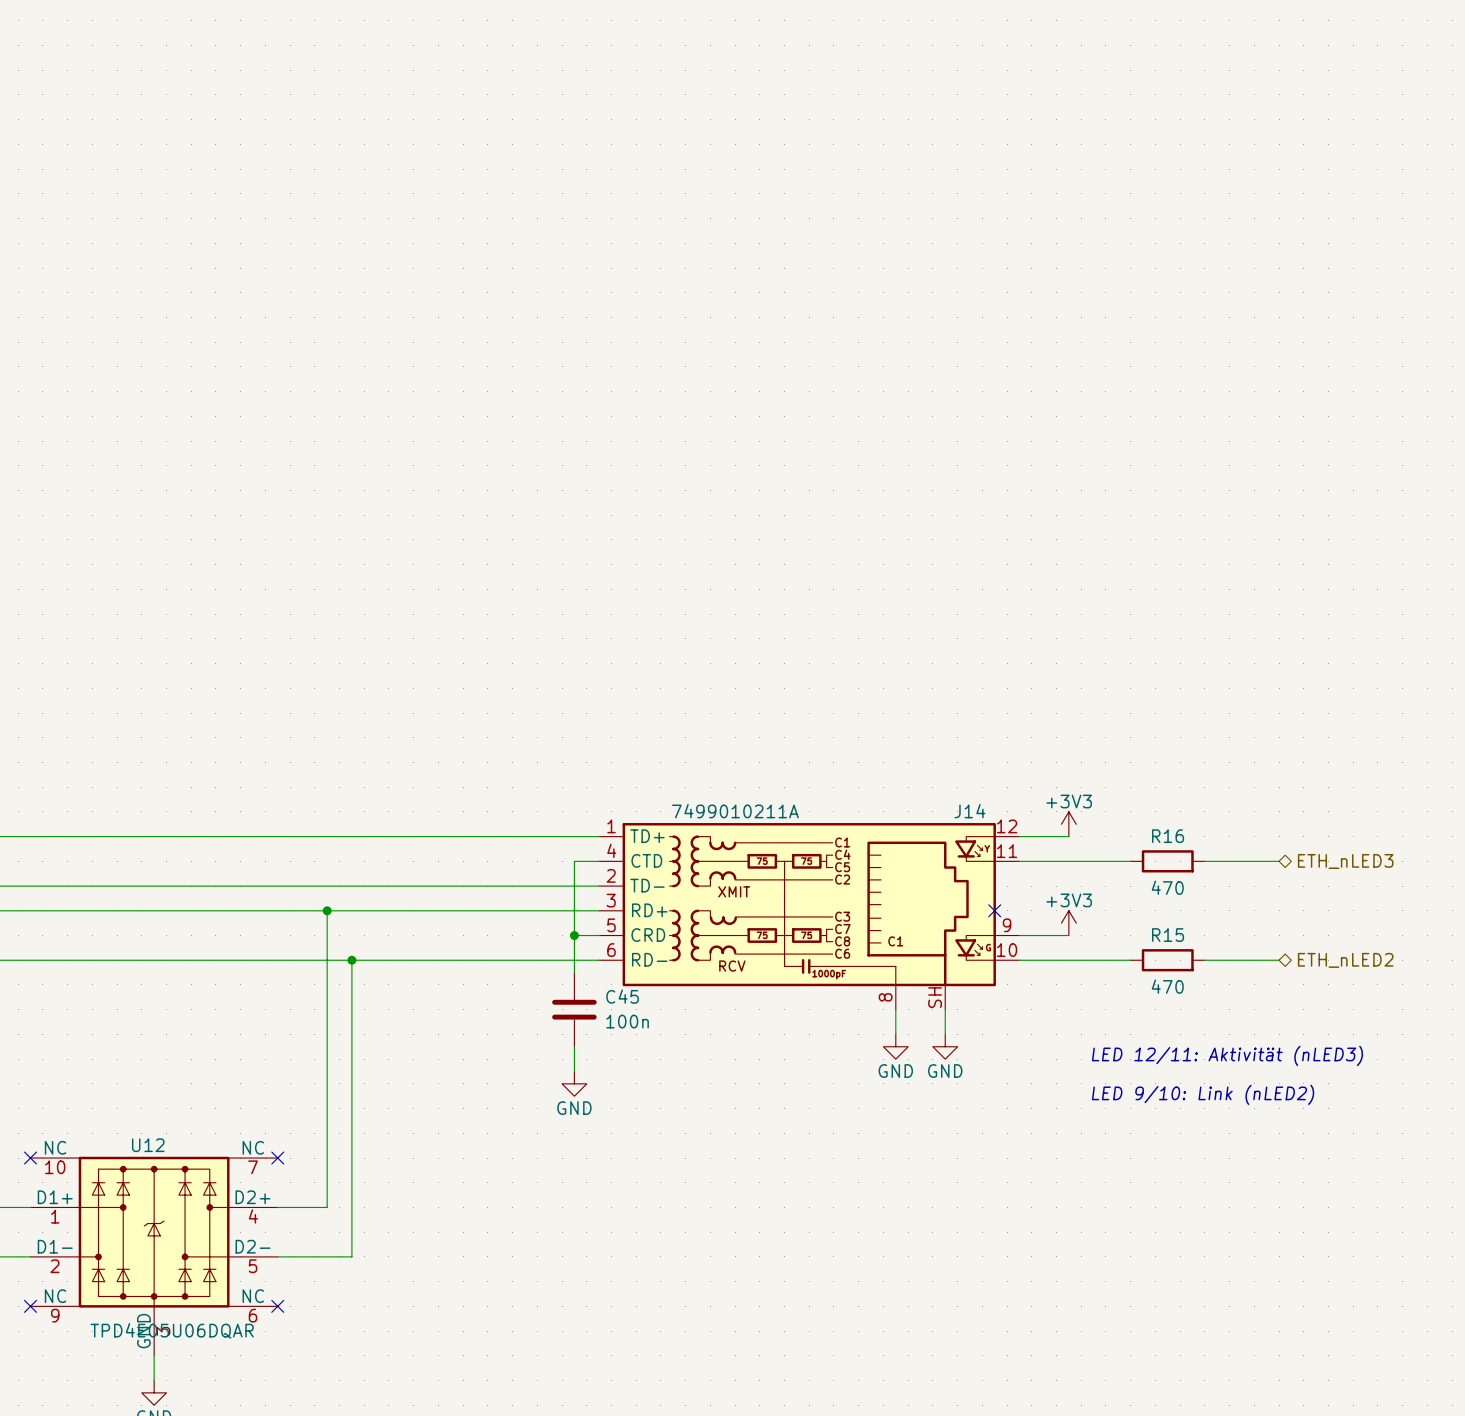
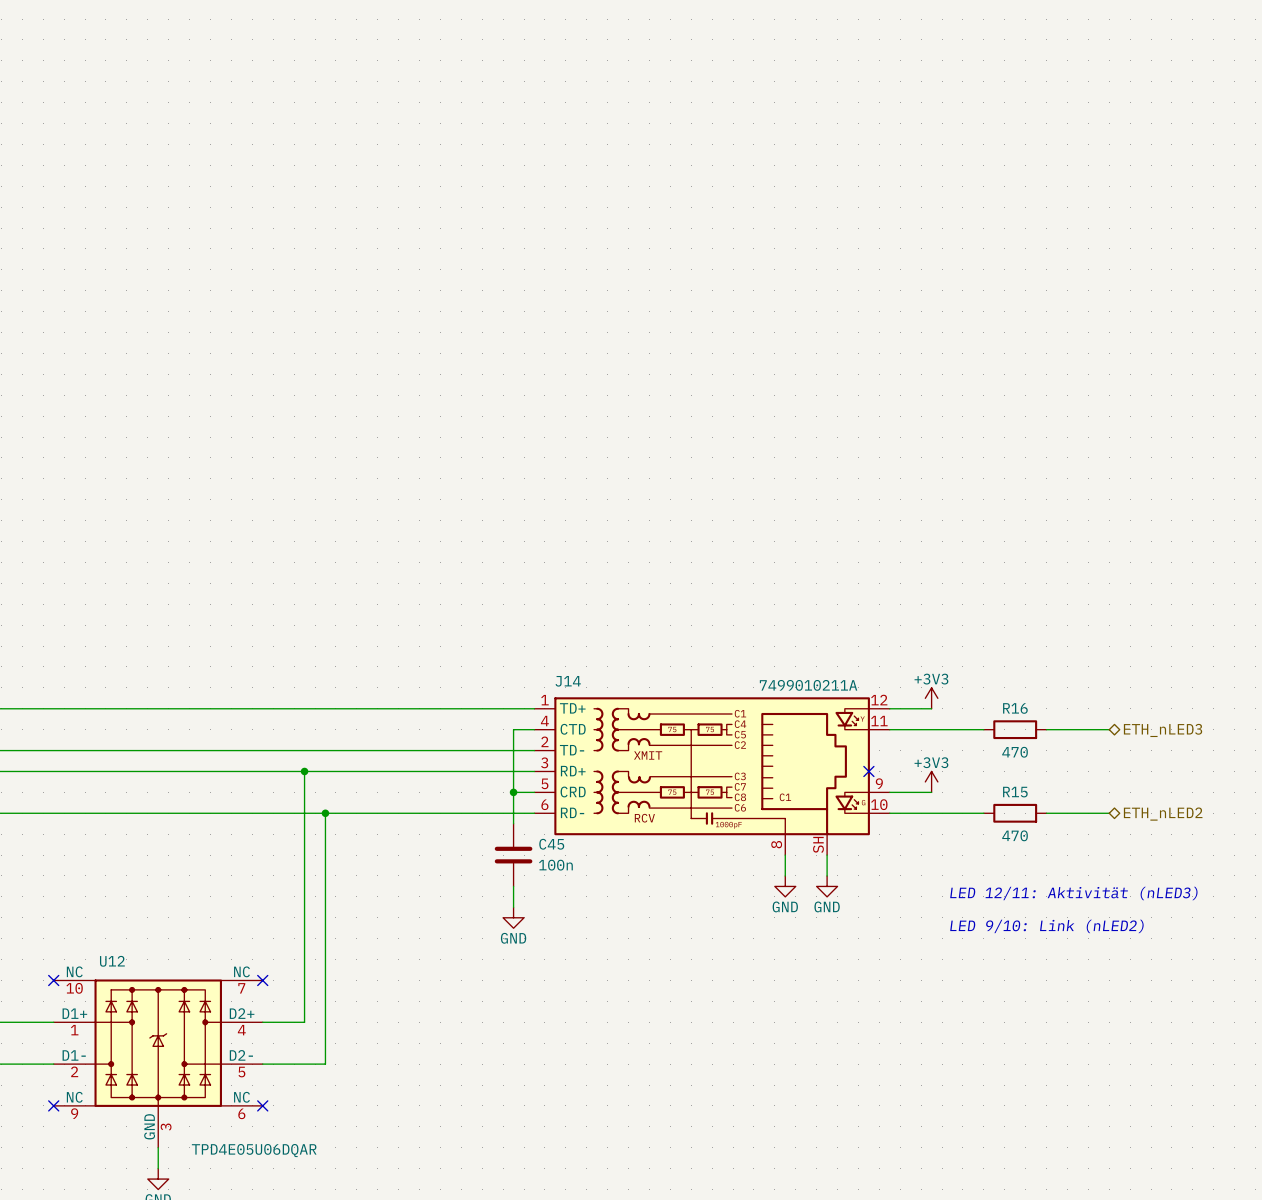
J14 value position: 7499010211A (735, 811) -> 7499010211A (808, 685)
J14 name position: J14 (969, 811) -> J14 (568, 681)
U12 name position: U12 (148, 1145) -> U12 (112, 961)
U12 value position: TPD4E05U06DQAR (172, 1330) -> TPD4E05U06DQAR (254, 1150)

